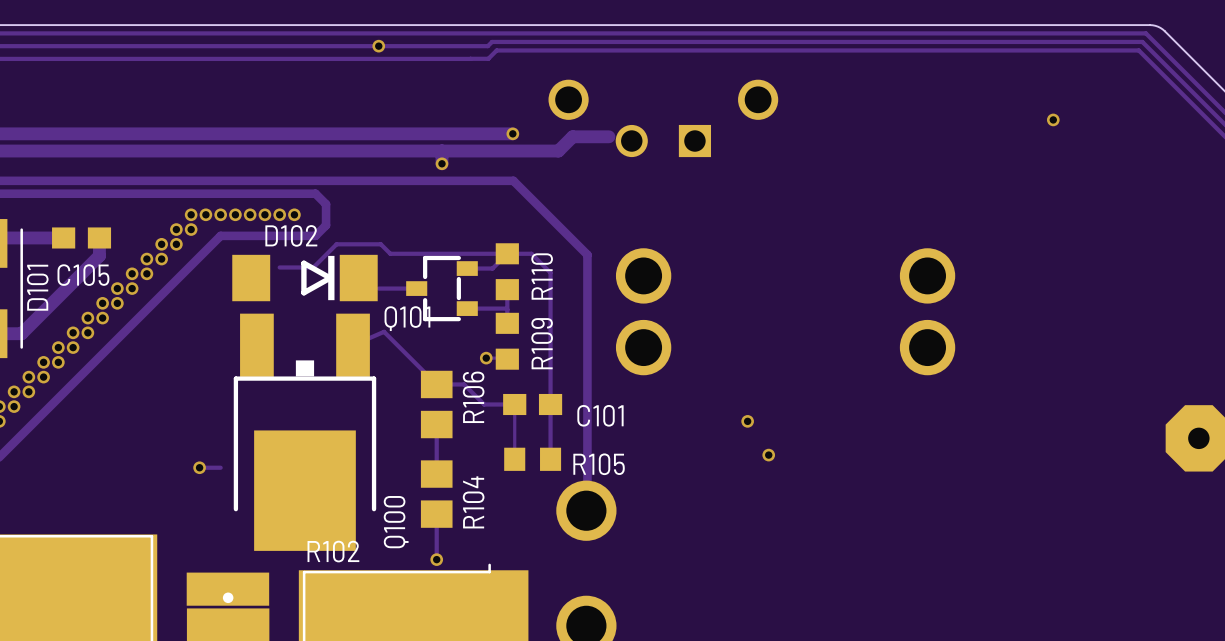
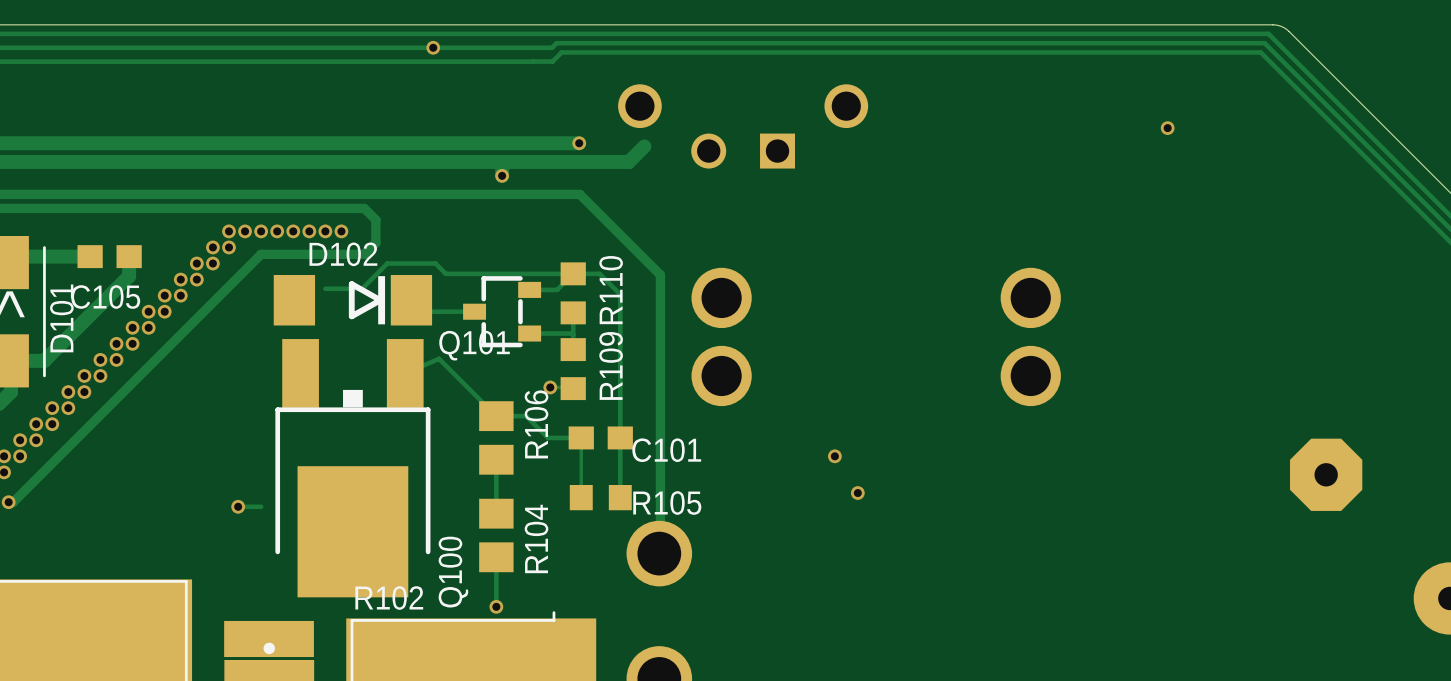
track: (608, 136) (572, 136) -> none

